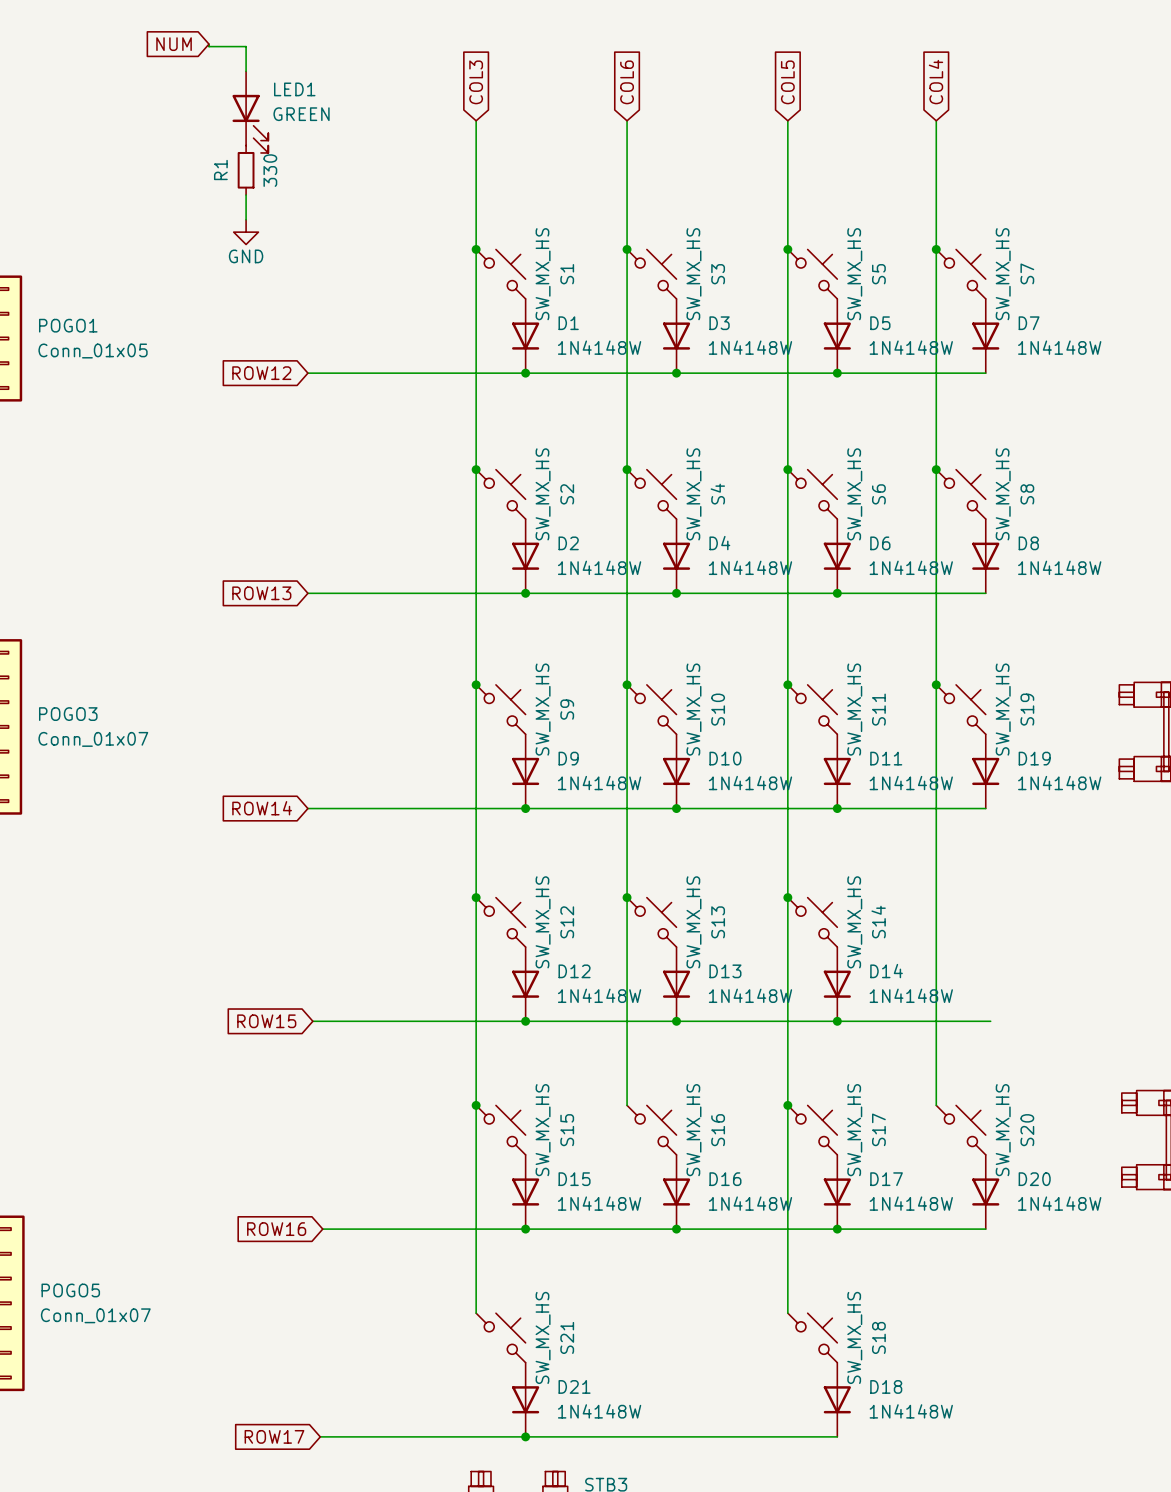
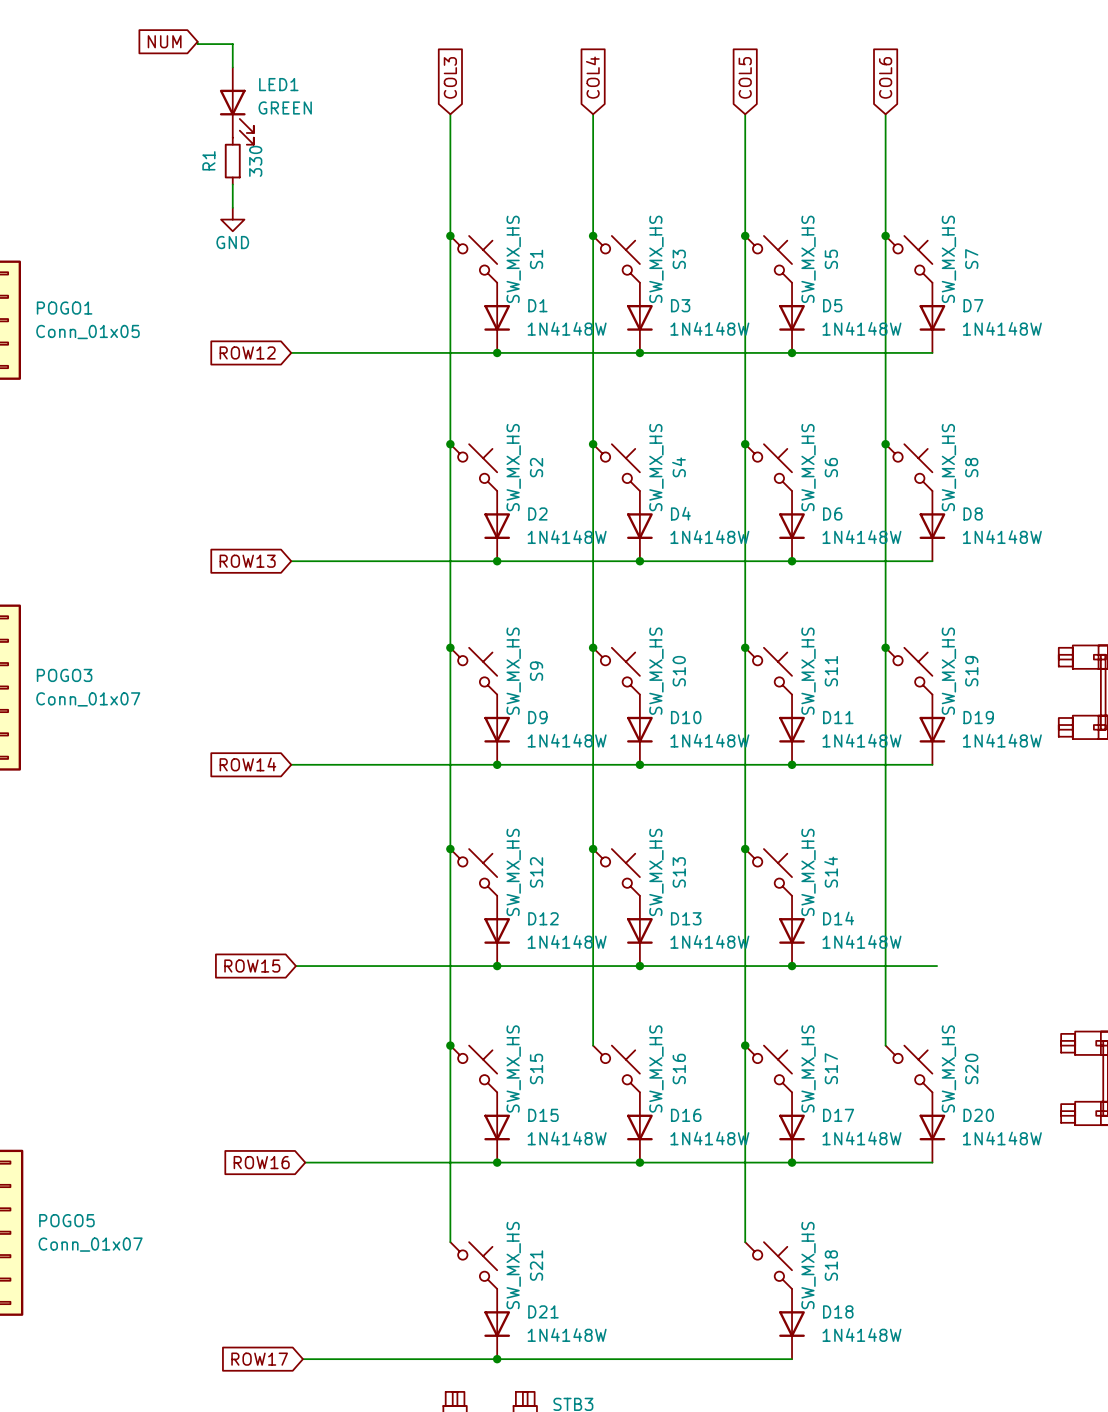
global label: COL6 (627, 82) -> COL4 (592, 77)
global label: COL4 (935, 82) -> COL6 (885, 77)

